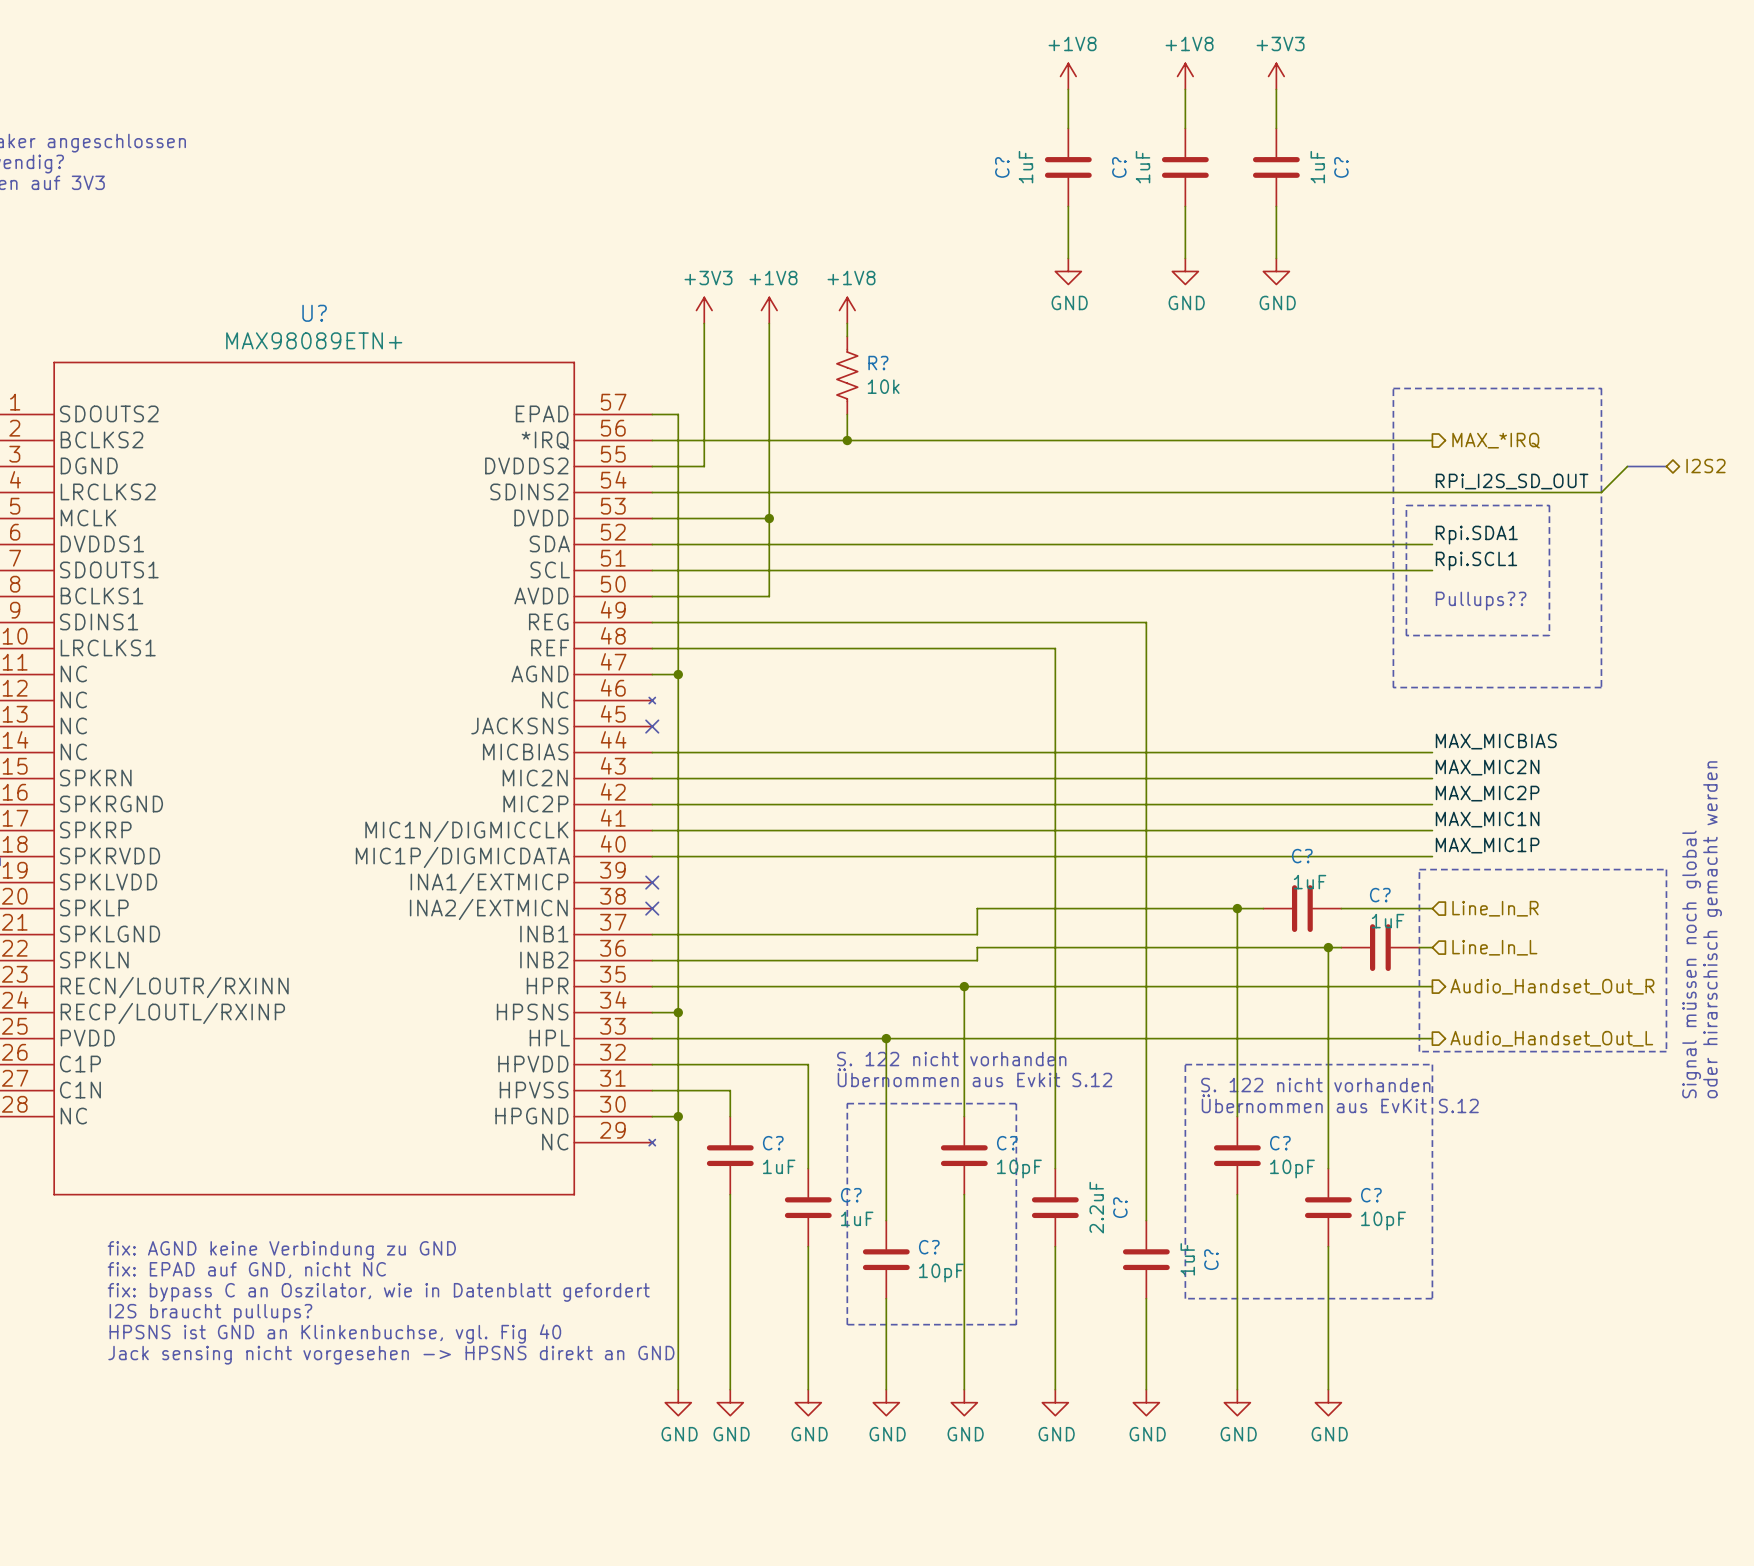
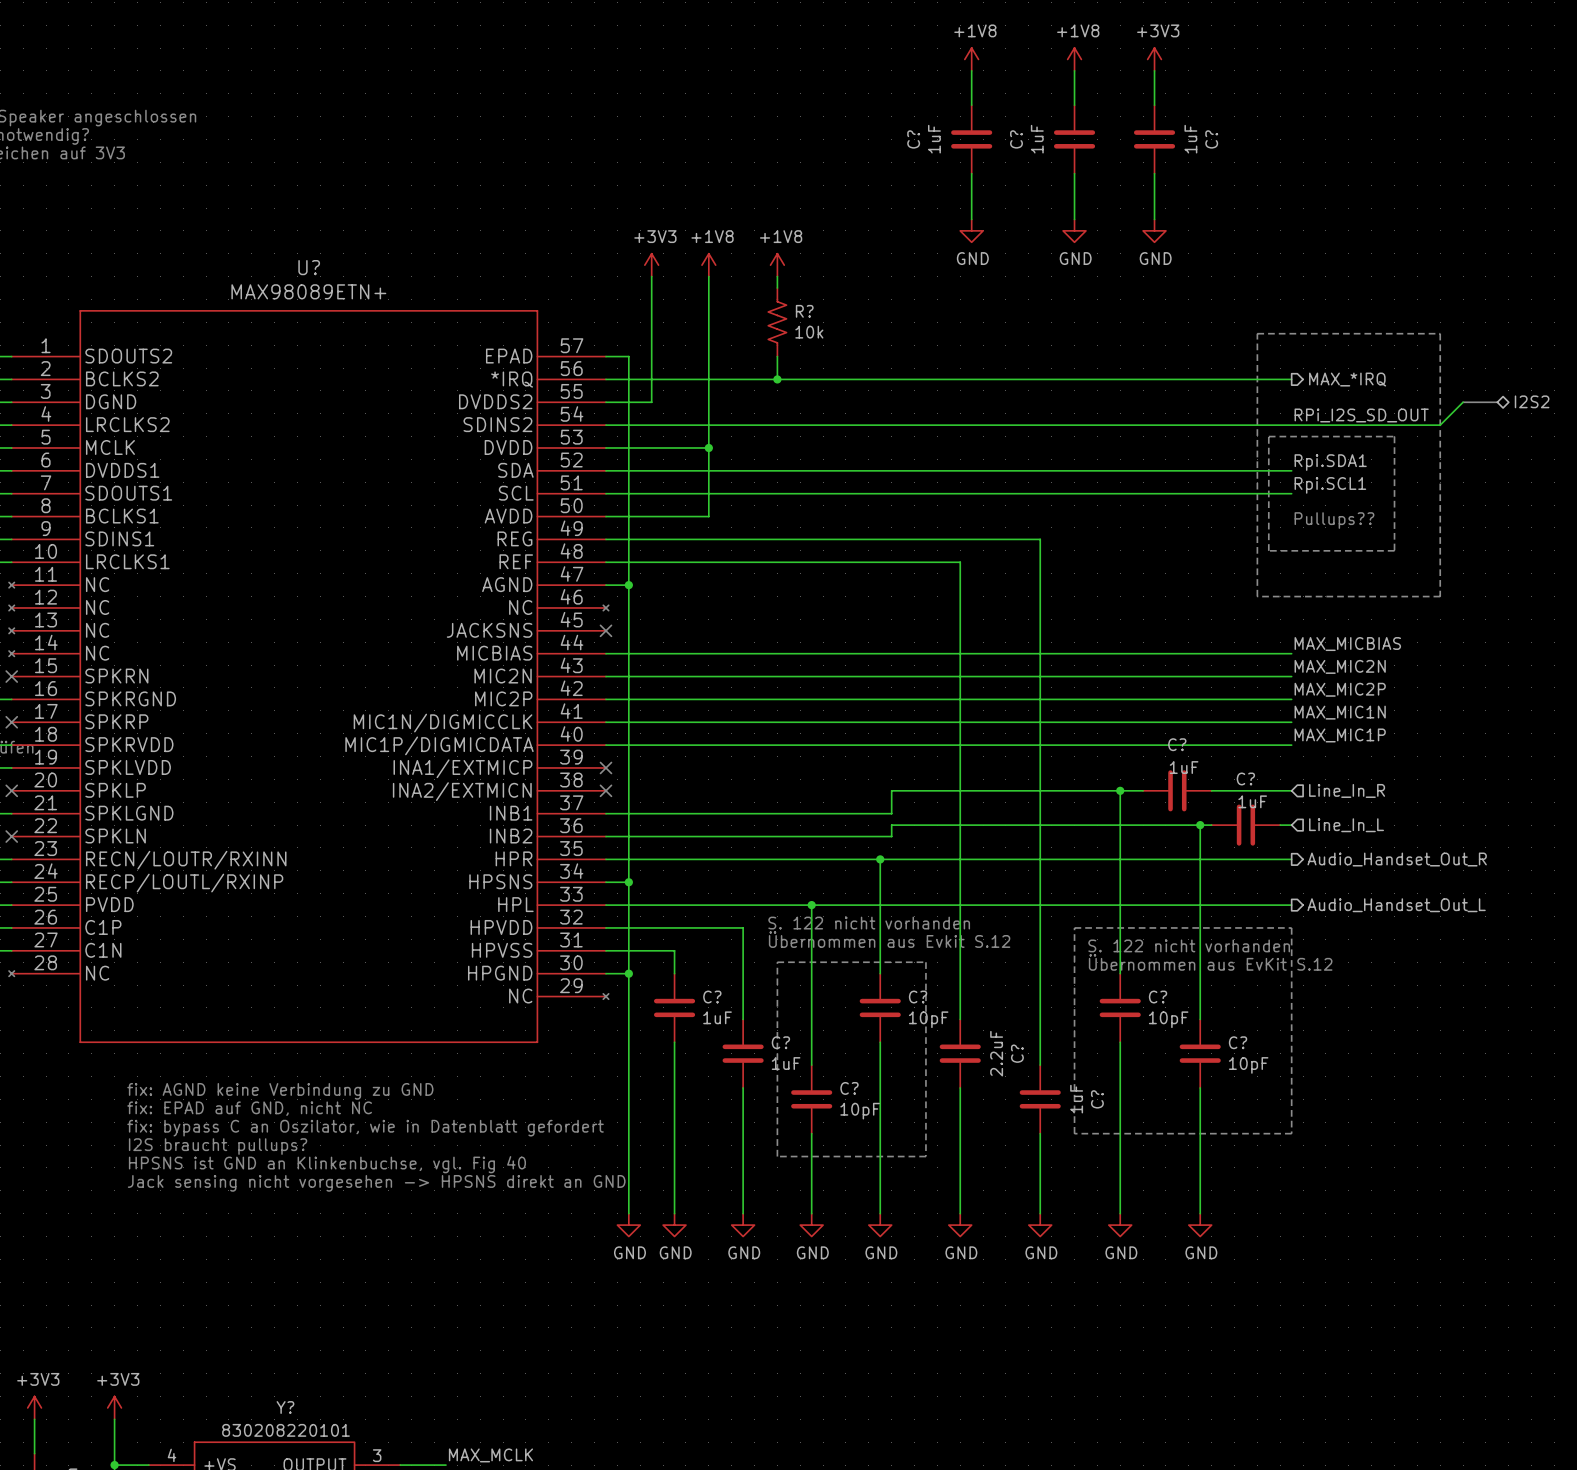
line: (1419, 869) (1666, 869) (1666, 1051) (1419, 1051) (1419, 869) -> none
text: oder hirarschisch gemacht werden (1712, 929) -> none
text: Signal müssen noch global (1691, 964) -> none

